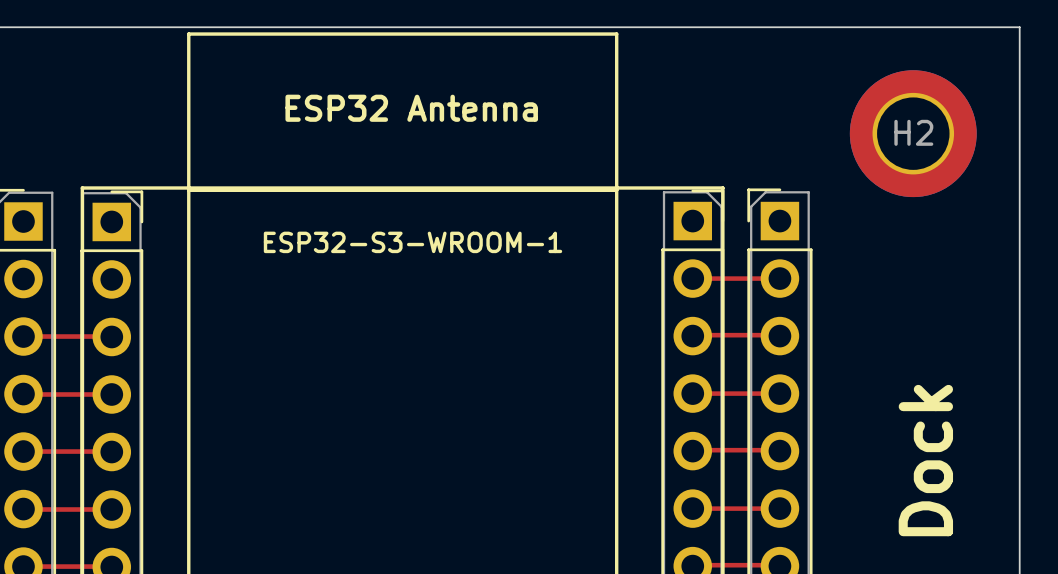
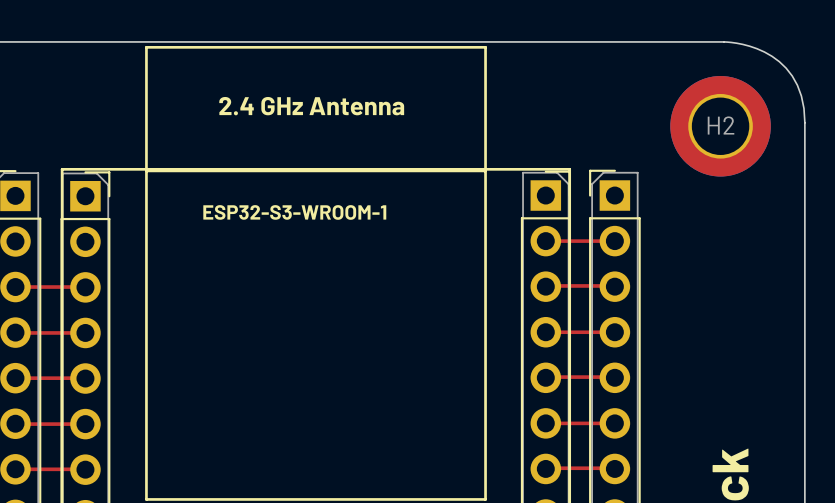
board edge: (917, 27) (1019, 27) (1019, 129) -> (724, 41) (756, 48) (772, 56) (786, 68) (797, 85) (801, 96) (804, 122)
text: ESP32 Antenna (411, 108) -> 2.4 GHz Antenna (311, 106)

